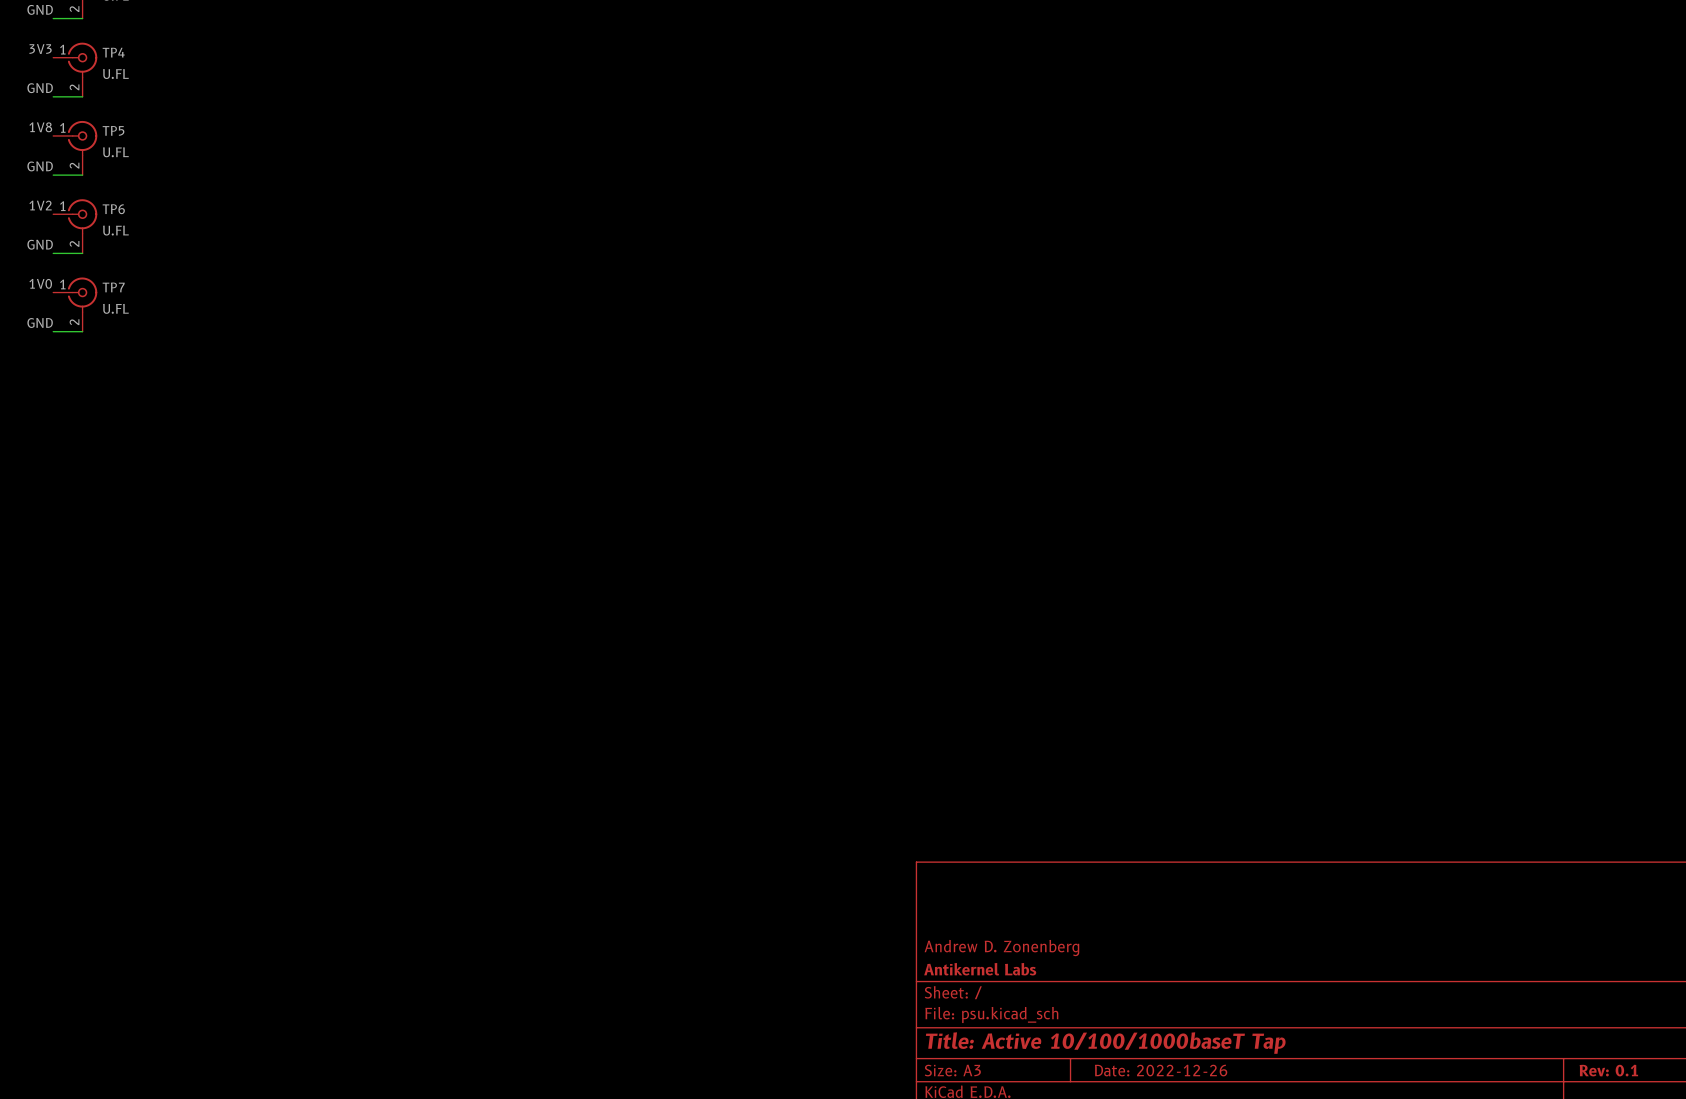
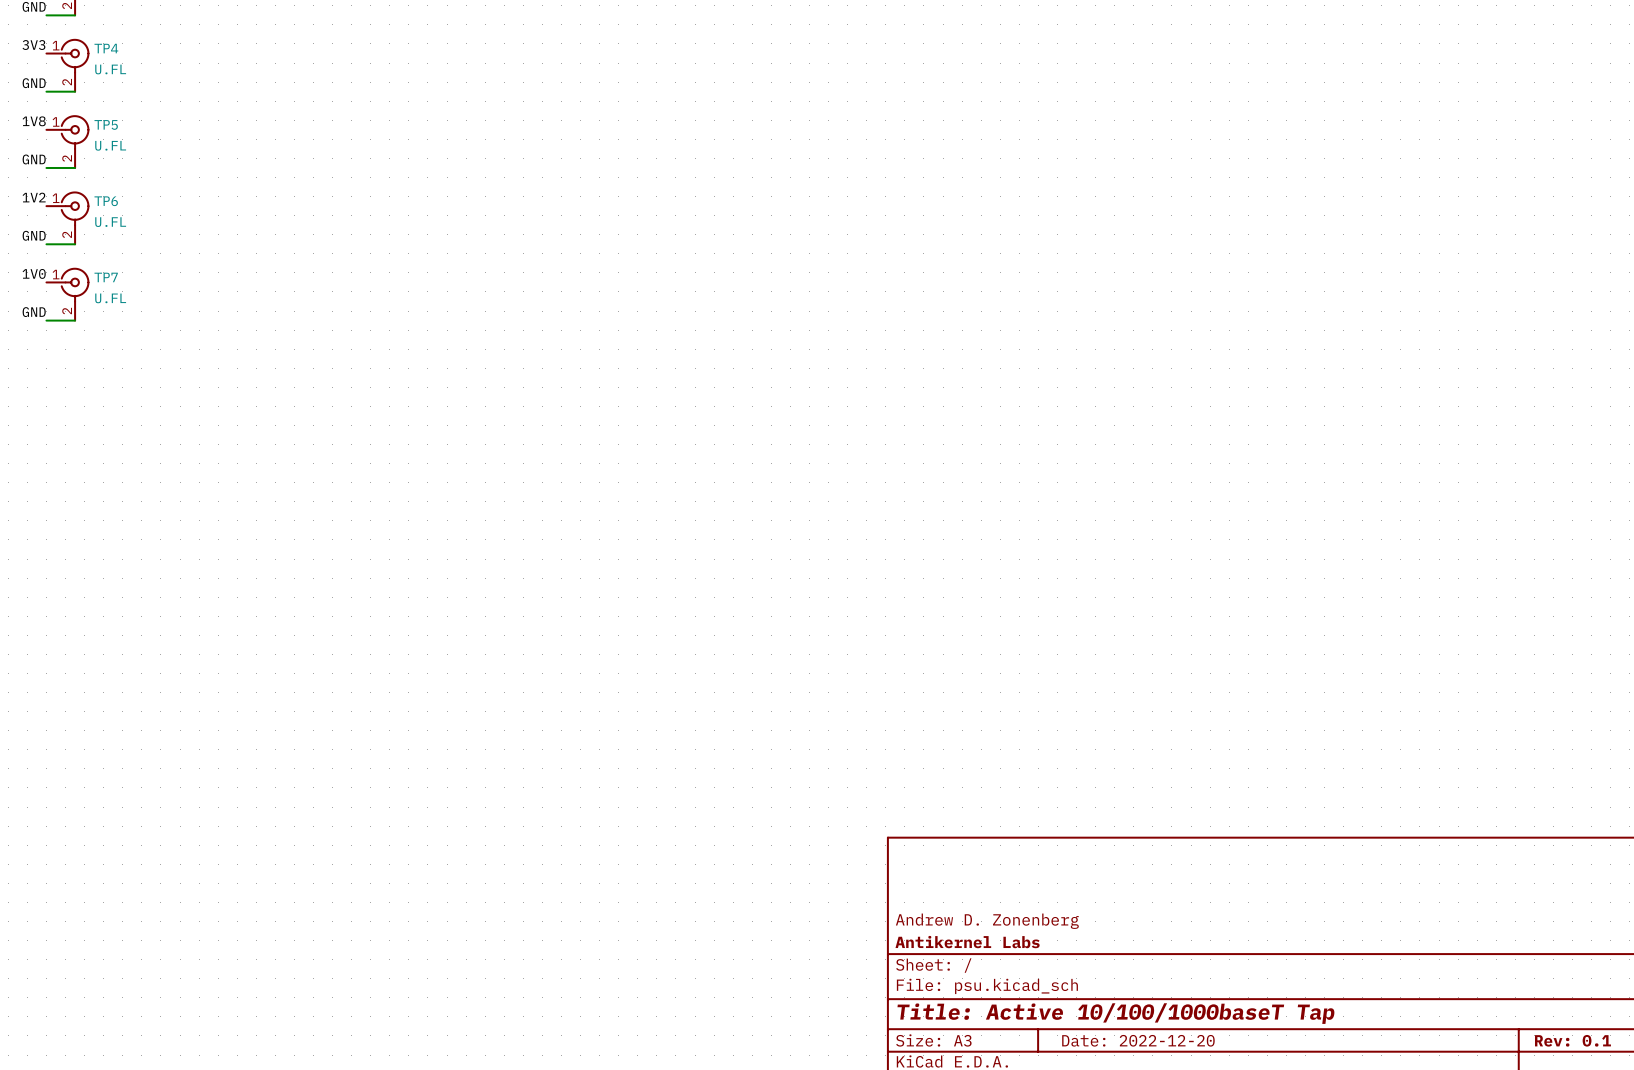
title block: Date: 2022-12-26 (1161, 1070) -> Date: 2022-12-20 (1138, 1040)

